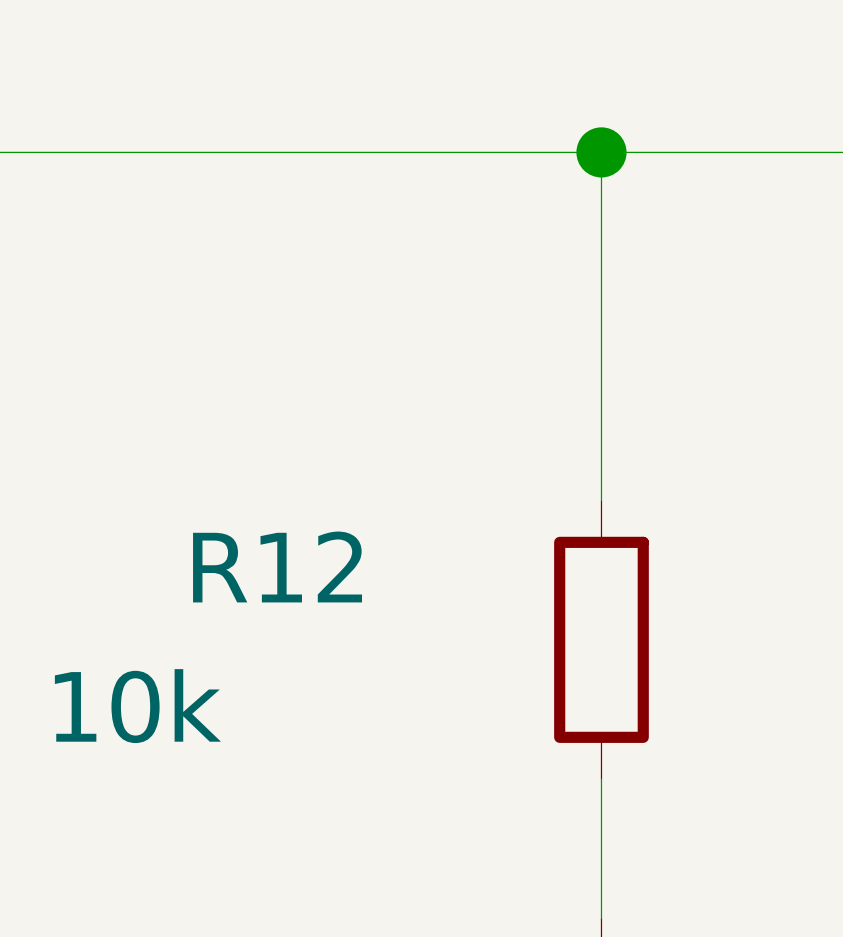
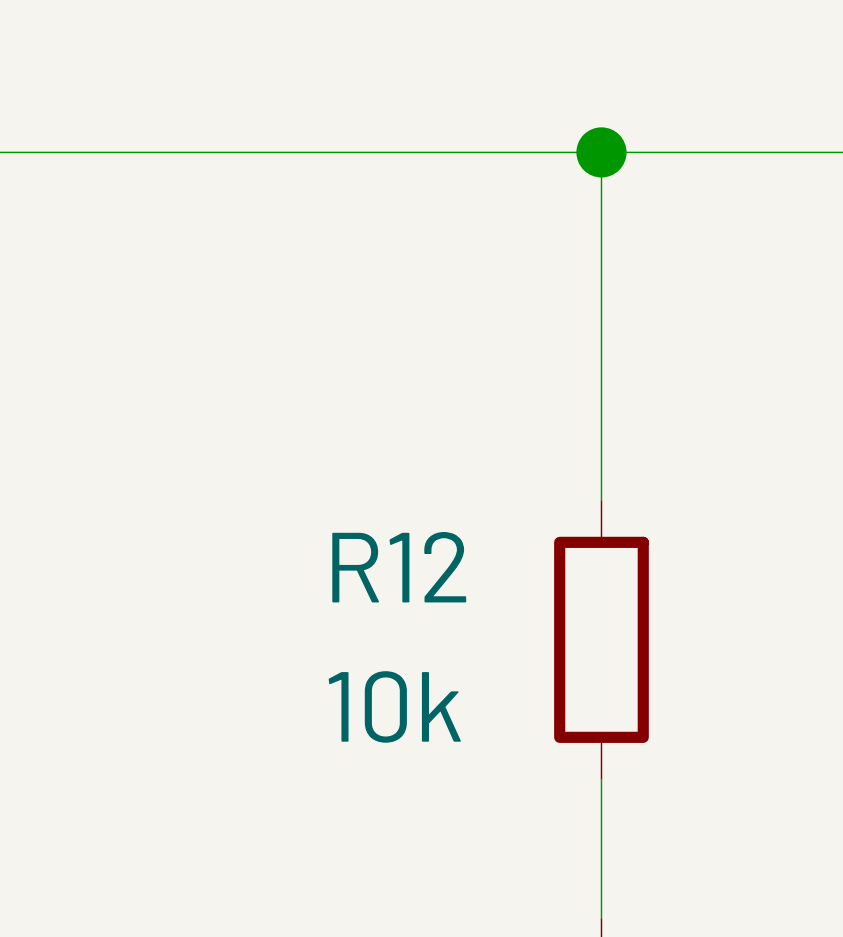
R12 name position: R12 (277, 566) -> R12 (399, 567)
R12 value position: 10k (137, 706) -> 10k (394, 706)

